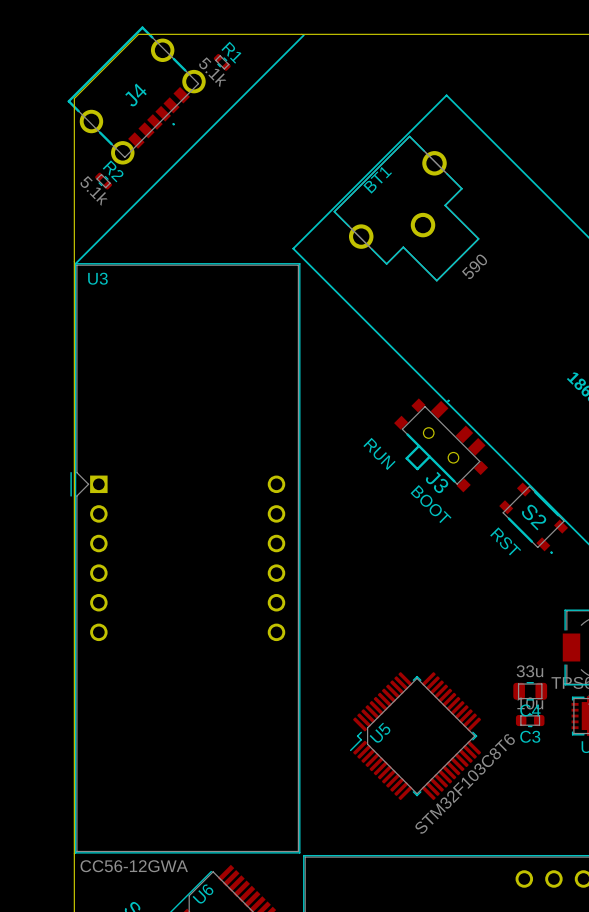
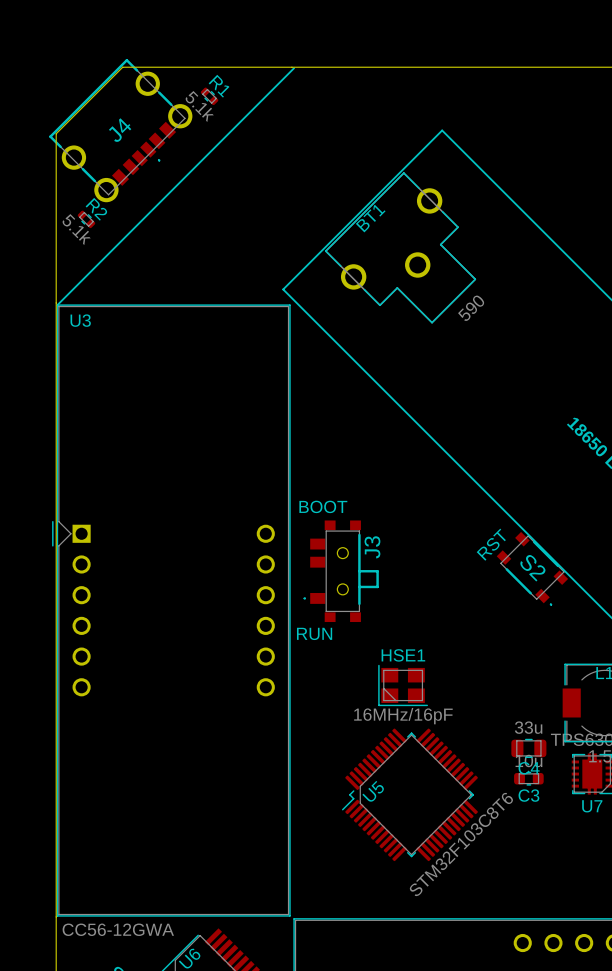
J3 rotation: 0° (441, 445) -> 135° counterclockwise (341, 571)
J3 position: (441, 445) -> (341, 571)
text rotation: 0° (379, 453) -> 45° counterclockwise (314, 633)
text position: RUN (379, 453) -> RUN (314, 633)
text rotation: 0° (431, 504) -> 45° counterclockwise (323, 506)
text position: BOOT (431, 504) -> BOOT (323, 506)
text rotation: 0° (505, 541) -> 90° counterclockwise (491, 544)
text position: RST (505, 541) -> RST (491, 544)
HSE1: none -> 16MHz/16pF (403, 685)

